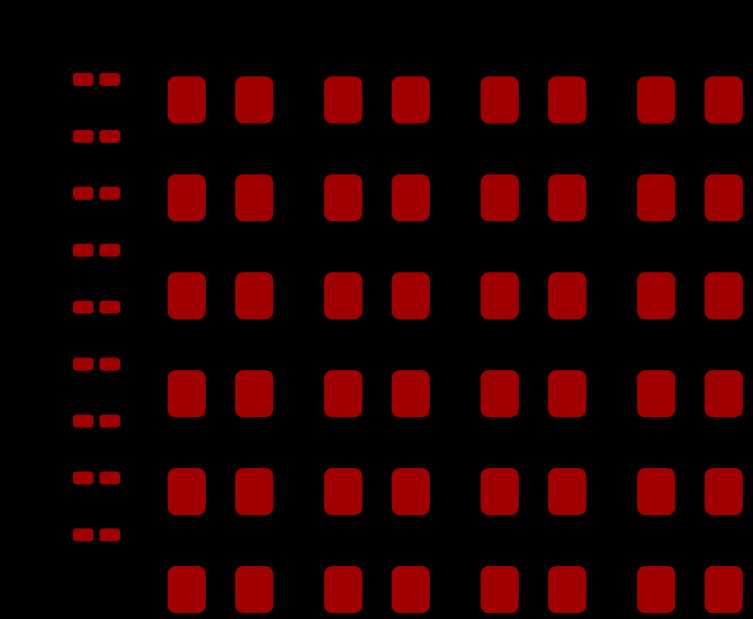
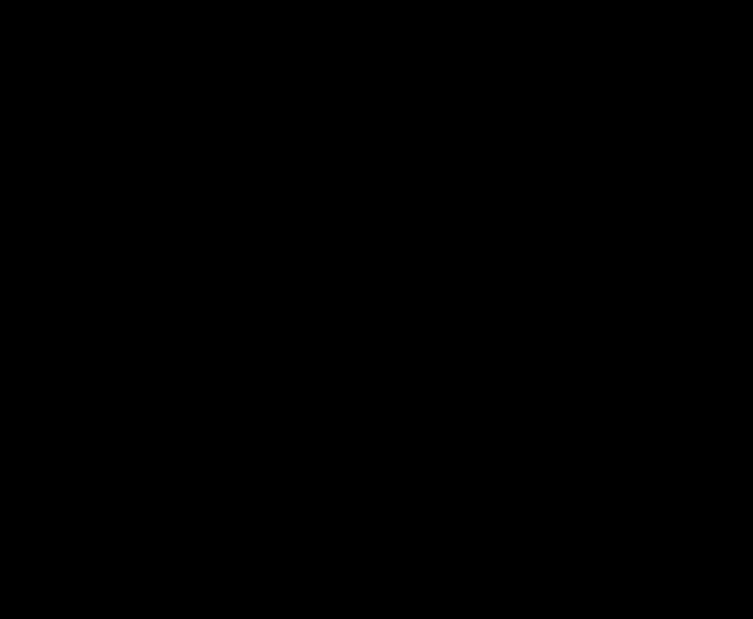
part: (96, 79) -> none
part: (220, 99) -> none
part: (376, 99) -> none
part: (533, 99) -> none
part: (689, 99) -> none
part: (96, 136) -> none
part: (96, 193) -> none
part: (220, 197) -> none
part: (376, 197) -> none
part: (533, 197) -> none
part: (689, 197) -> none
part: (96, 250) -> none
part: (220, 295) -> none
part: (376, 295) -> none
part: (533, 295) -> none
part: (689, 295) -> none
part: (96, 307) -> none
part: (96, 364) -> none
part: (220, 393) -> none
part: (376, 393) -> none
part: (533, 393) -> none
part: (689, 393) -> none
part: (96, 421) -> none
part: (96, 477) -> none
part: (220, 491) -> none
part: (376, 491) -> none
part: (533, 491) -> none
part: (689, 491) -> none
part: (96, 534) -> none
part: (220, 589) -> none
part: (376, 589) -> none
part: (533, 589) -> none
part: (689, 589) -> none

